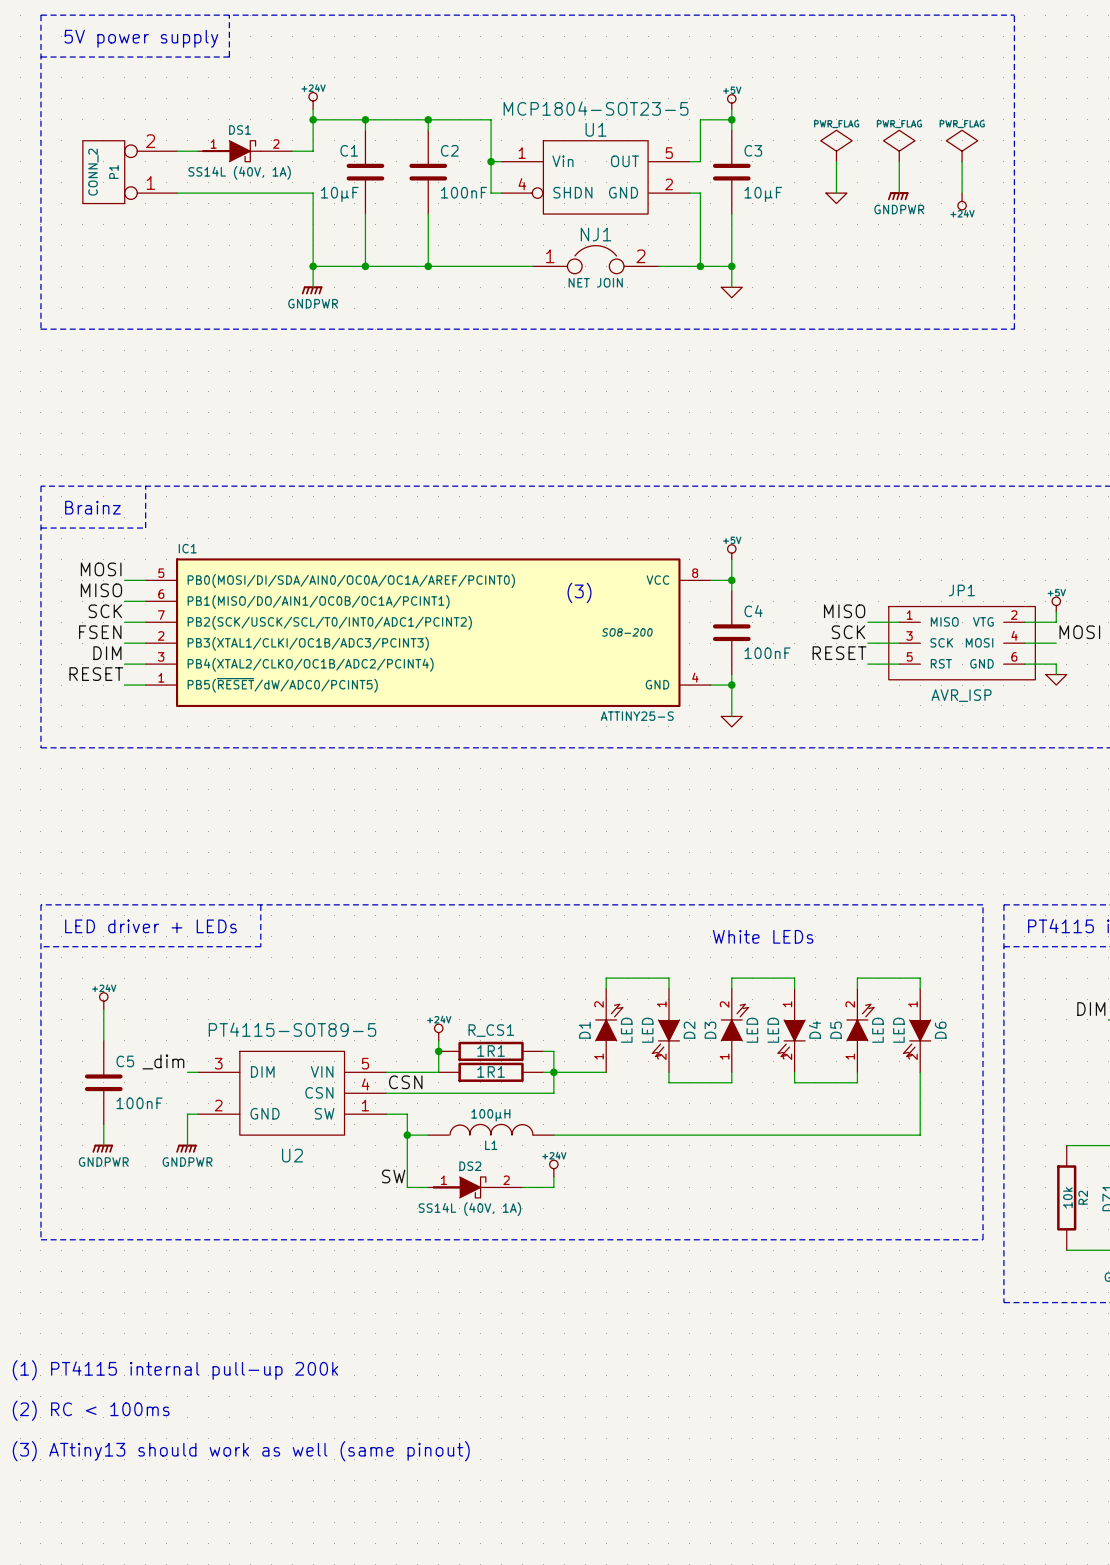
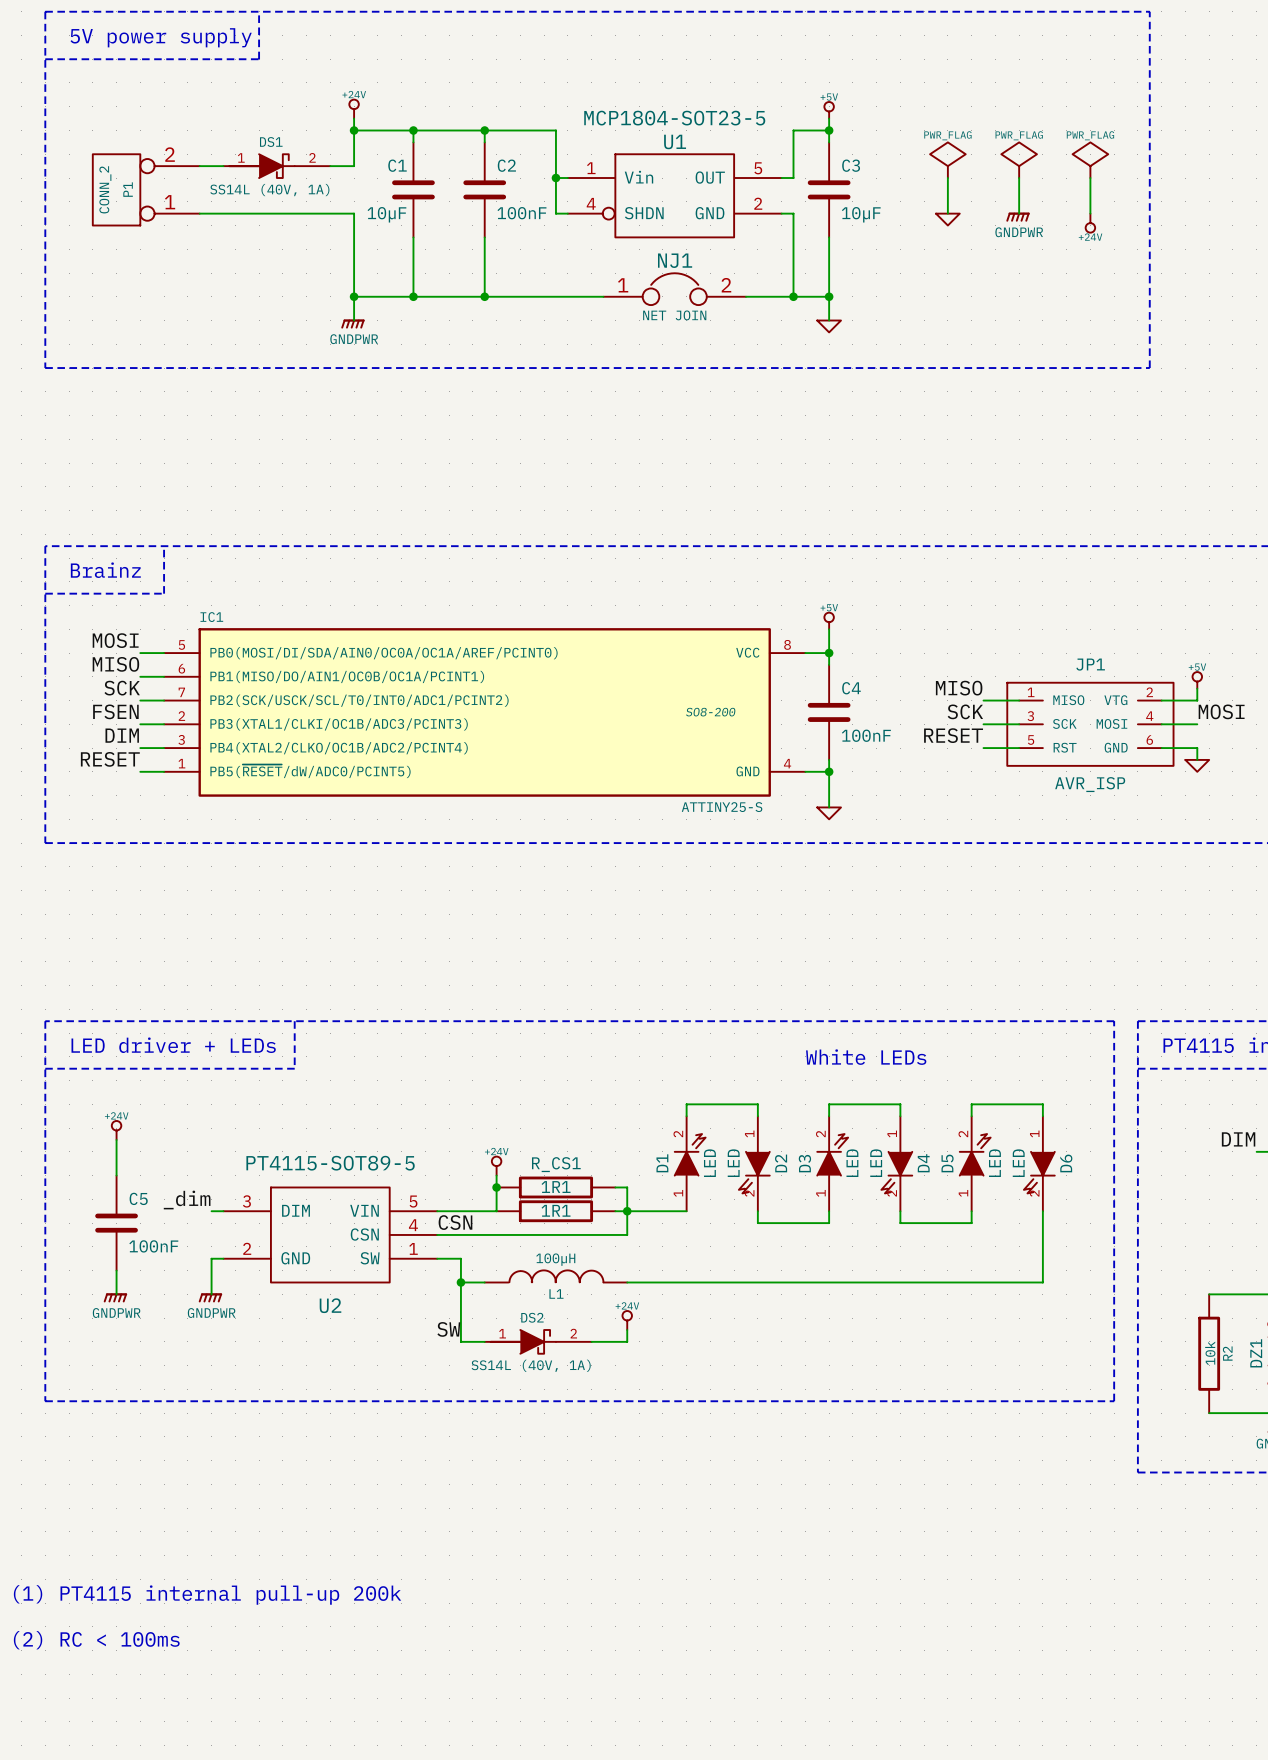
text: (3) (579, 592) -> none
text: (1) PT4115 internal pull-up 200k (175, 1370) -> none
text: (2) RC < 100ms (91, 1410) -> (1) PT4115 internal pull-up 200k (207, 1594)
text: (3) ATtiny13 should work as well (same pinout) (241, 1451) -> (2) RC < 100ms (96, 1640)

